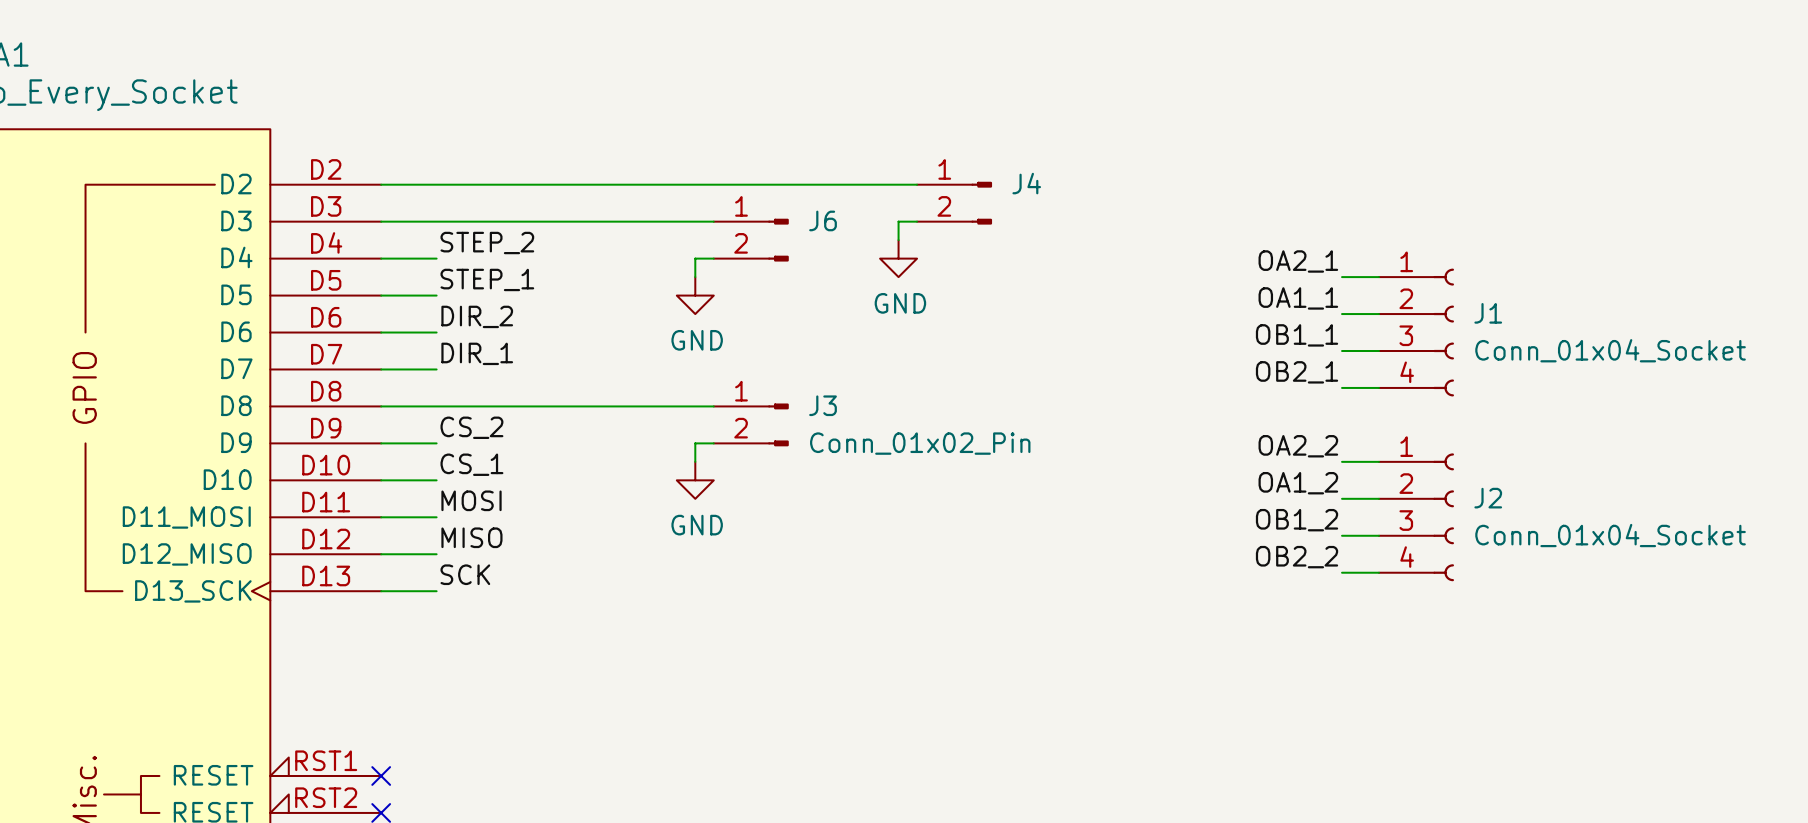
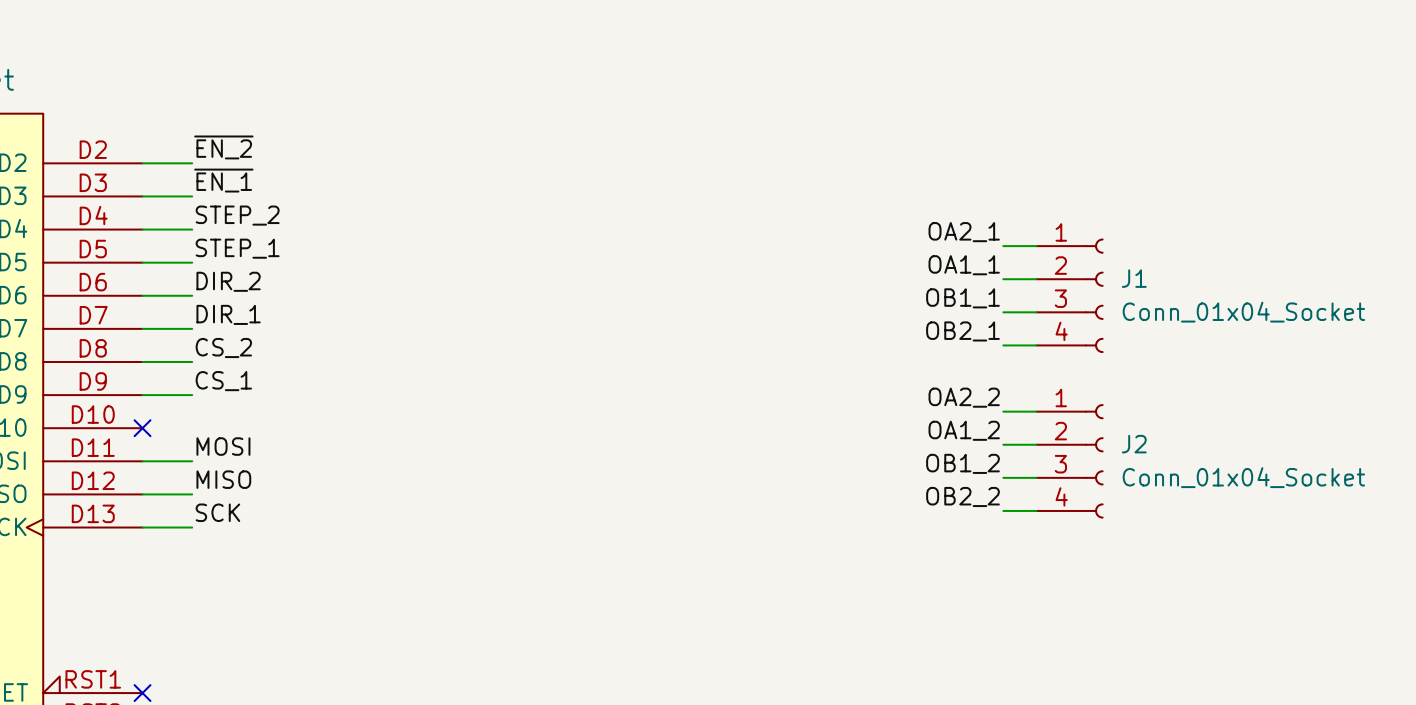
label: none -> ~{EN_2} (223, 147)
wire: (436, 184) (917, 184) -> none
label: none -> ~{EN_1} (223, 180)
J4: (954, 203) -> none
wire: (436, 221) (713, 221) -> none
wire: (917, 221) (898, 221) (898, 240) -> none
J6: (751, 240) -> none
wire: (713, 258) (695, 258) (695, 277) -> none
power symbol: GND (898, 258) -> none
power symbol: GND (695, 295) -> none
label: none -> CS_2 (223, 348)
wire: (436, 406) (713, 406) -> none
J3: Conn_01x02_Pin (751, 424) -> none
label: CS_2 (471, 427) -> CS_1 (223, 381)
wire: (713, 443) (695, 443) (695, 461) -> none
label: CS_1 (471, 464) -> none
wire: (381, 480) (436, 480) -> none
no-connect mark: none -> (142, 428)
power symbol: GND (695, 480) -> none

